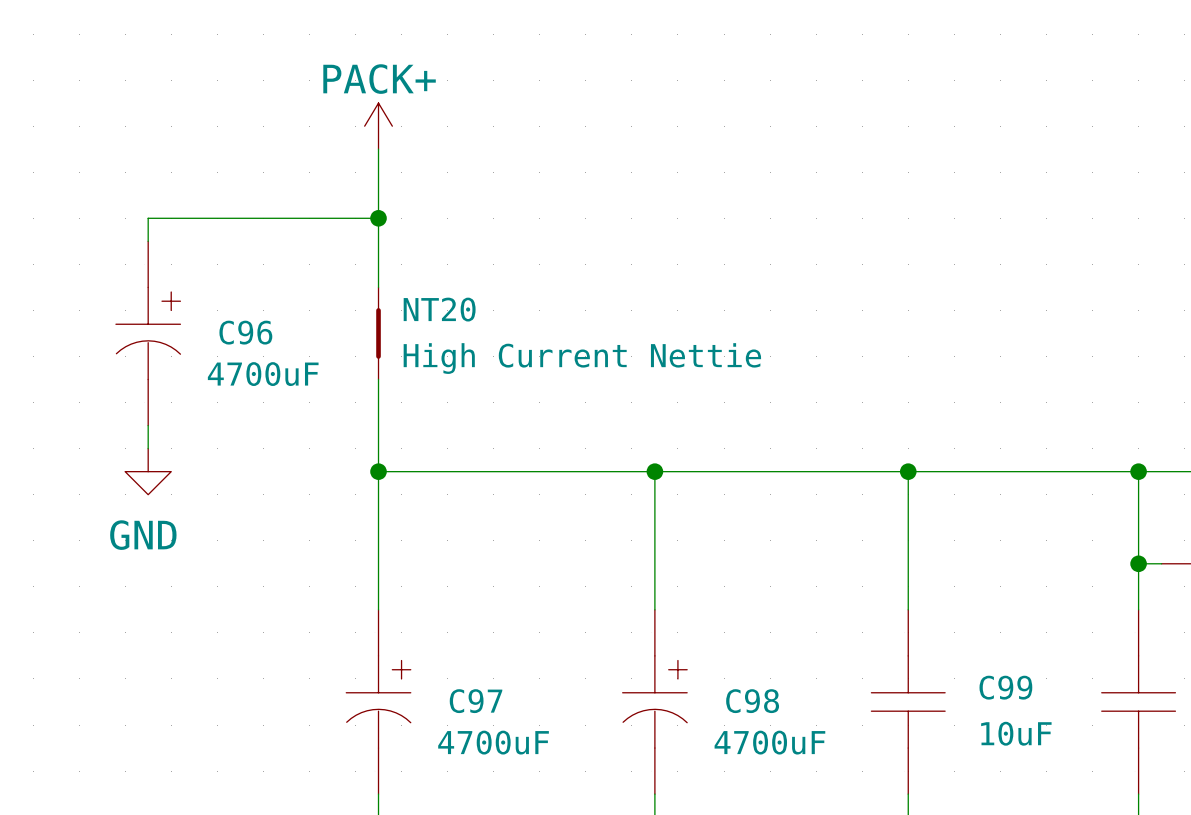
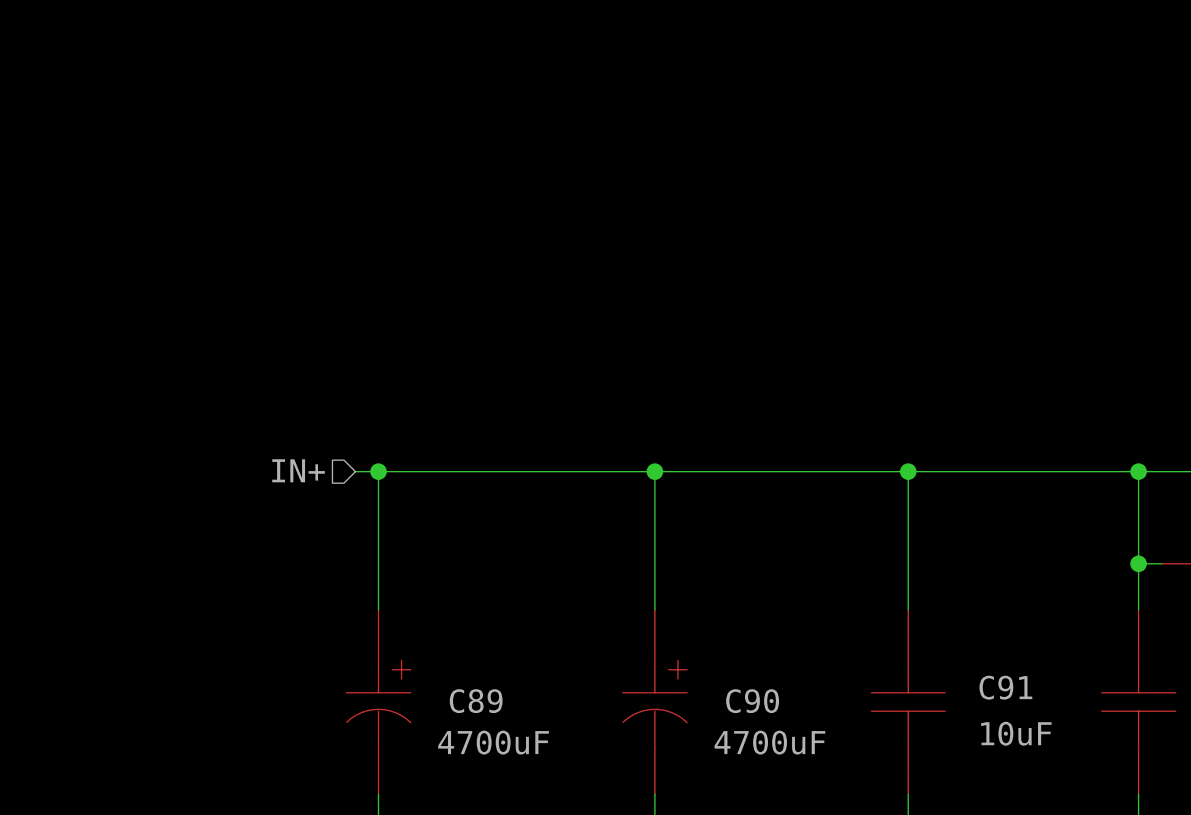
power symbol: PACK+ (378, 126) -> none
wire: (378, 149) (378, 287) -> none
wire: (378, 218) (148, 218) (148, 241) -> none
junction: (378, 218) -> none
C96: 4700uF (148, 333) -> none
NT20: High Current Nettie (378, 333) -> none
wire: (378, 379) (378, 471) -> (355, 471) (378, 471)
wire: (148, 425) (148, 448) -> none
hierarchical label: none -> IN+ (298, 470)
power symbol: GND (148, 471) -> none
C99 name: C99 (1005, 687) -> C91 (1005, 687)
C97 name: C97 (476, 701) -> C89 (476, 701)
C98 name: C98 (752, 701) -> C90 (752, 701)

